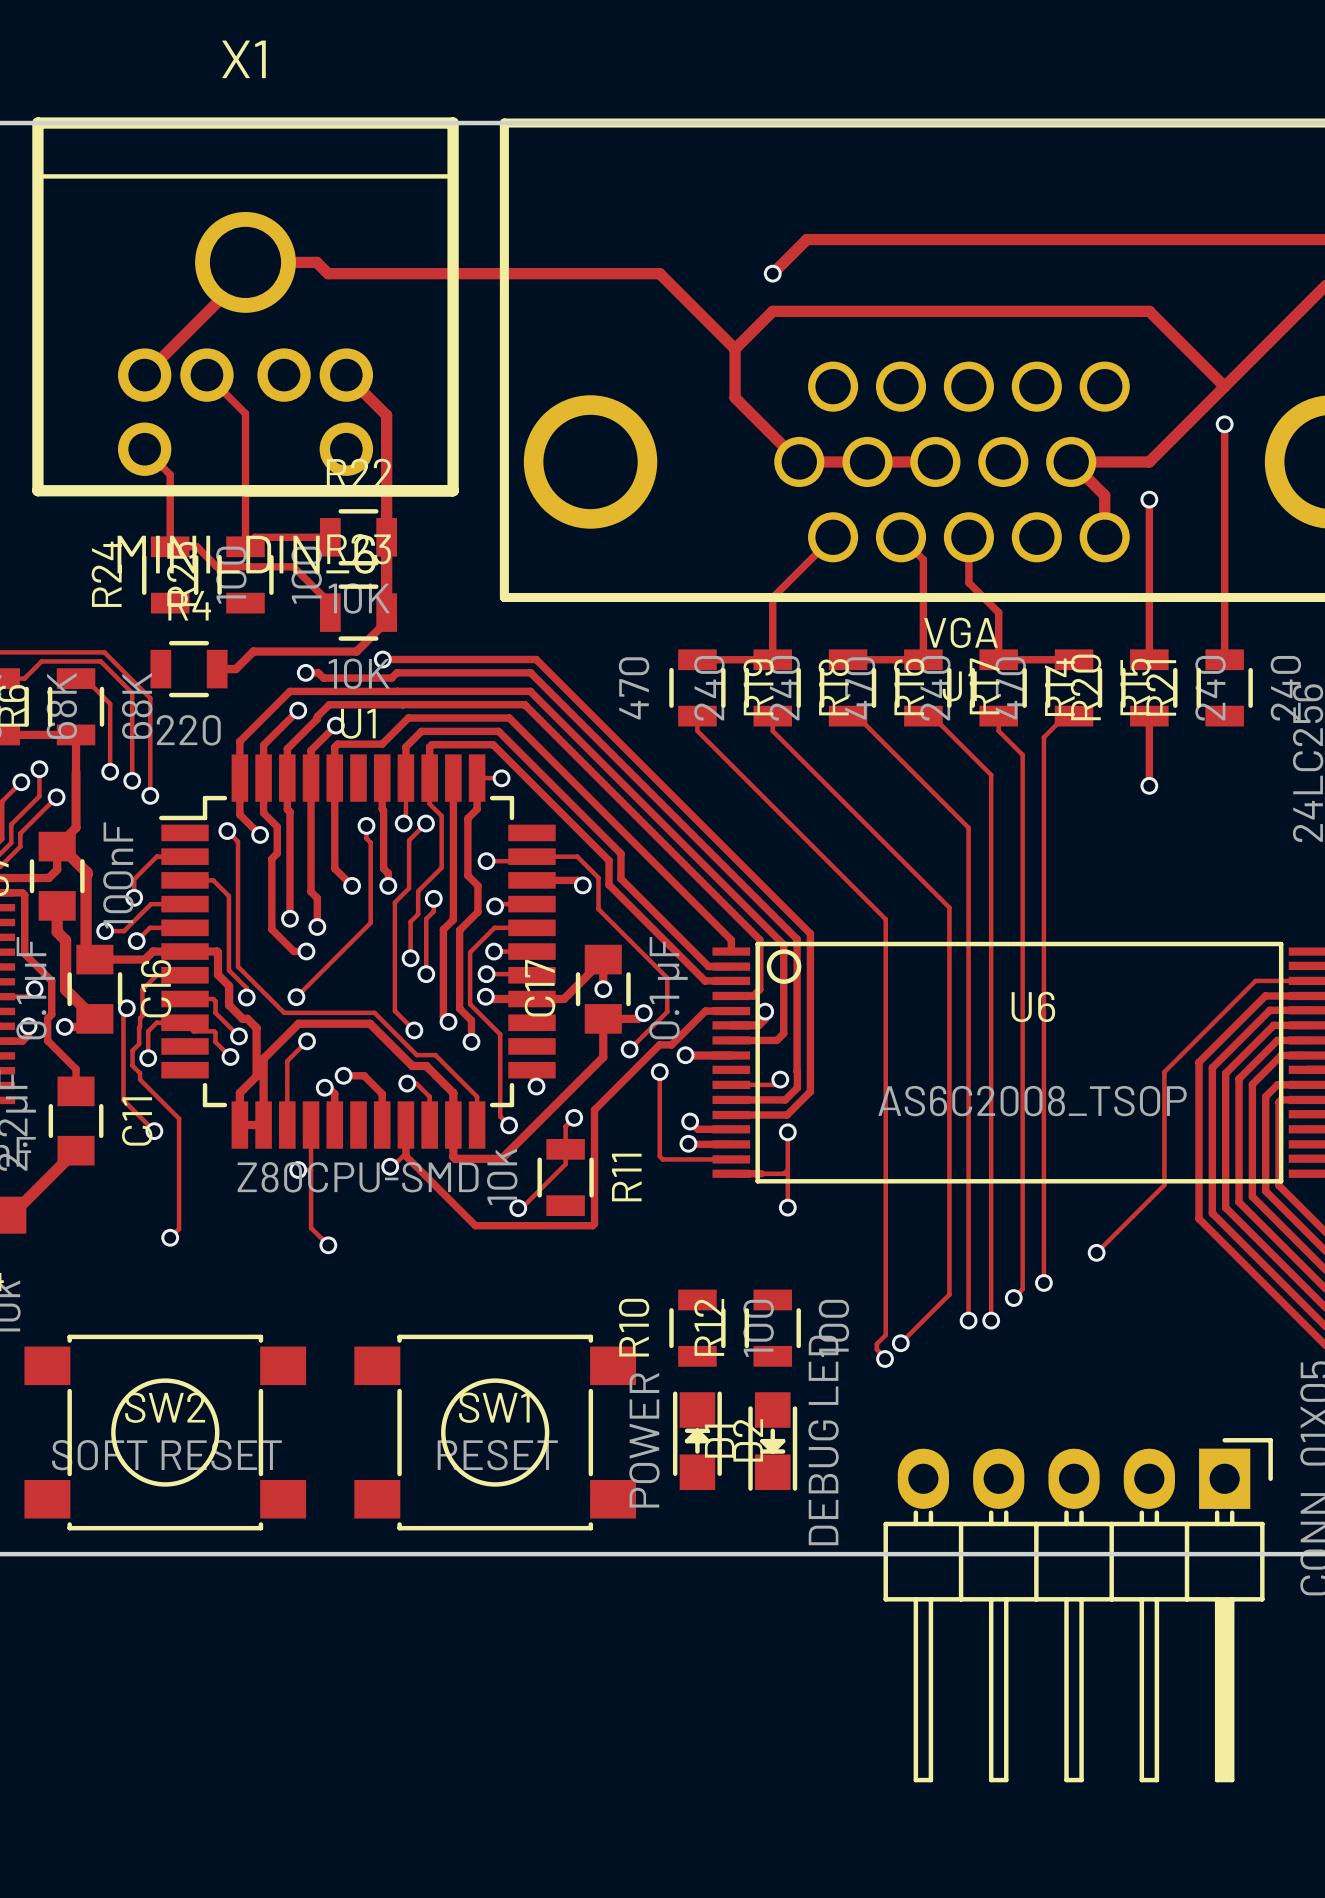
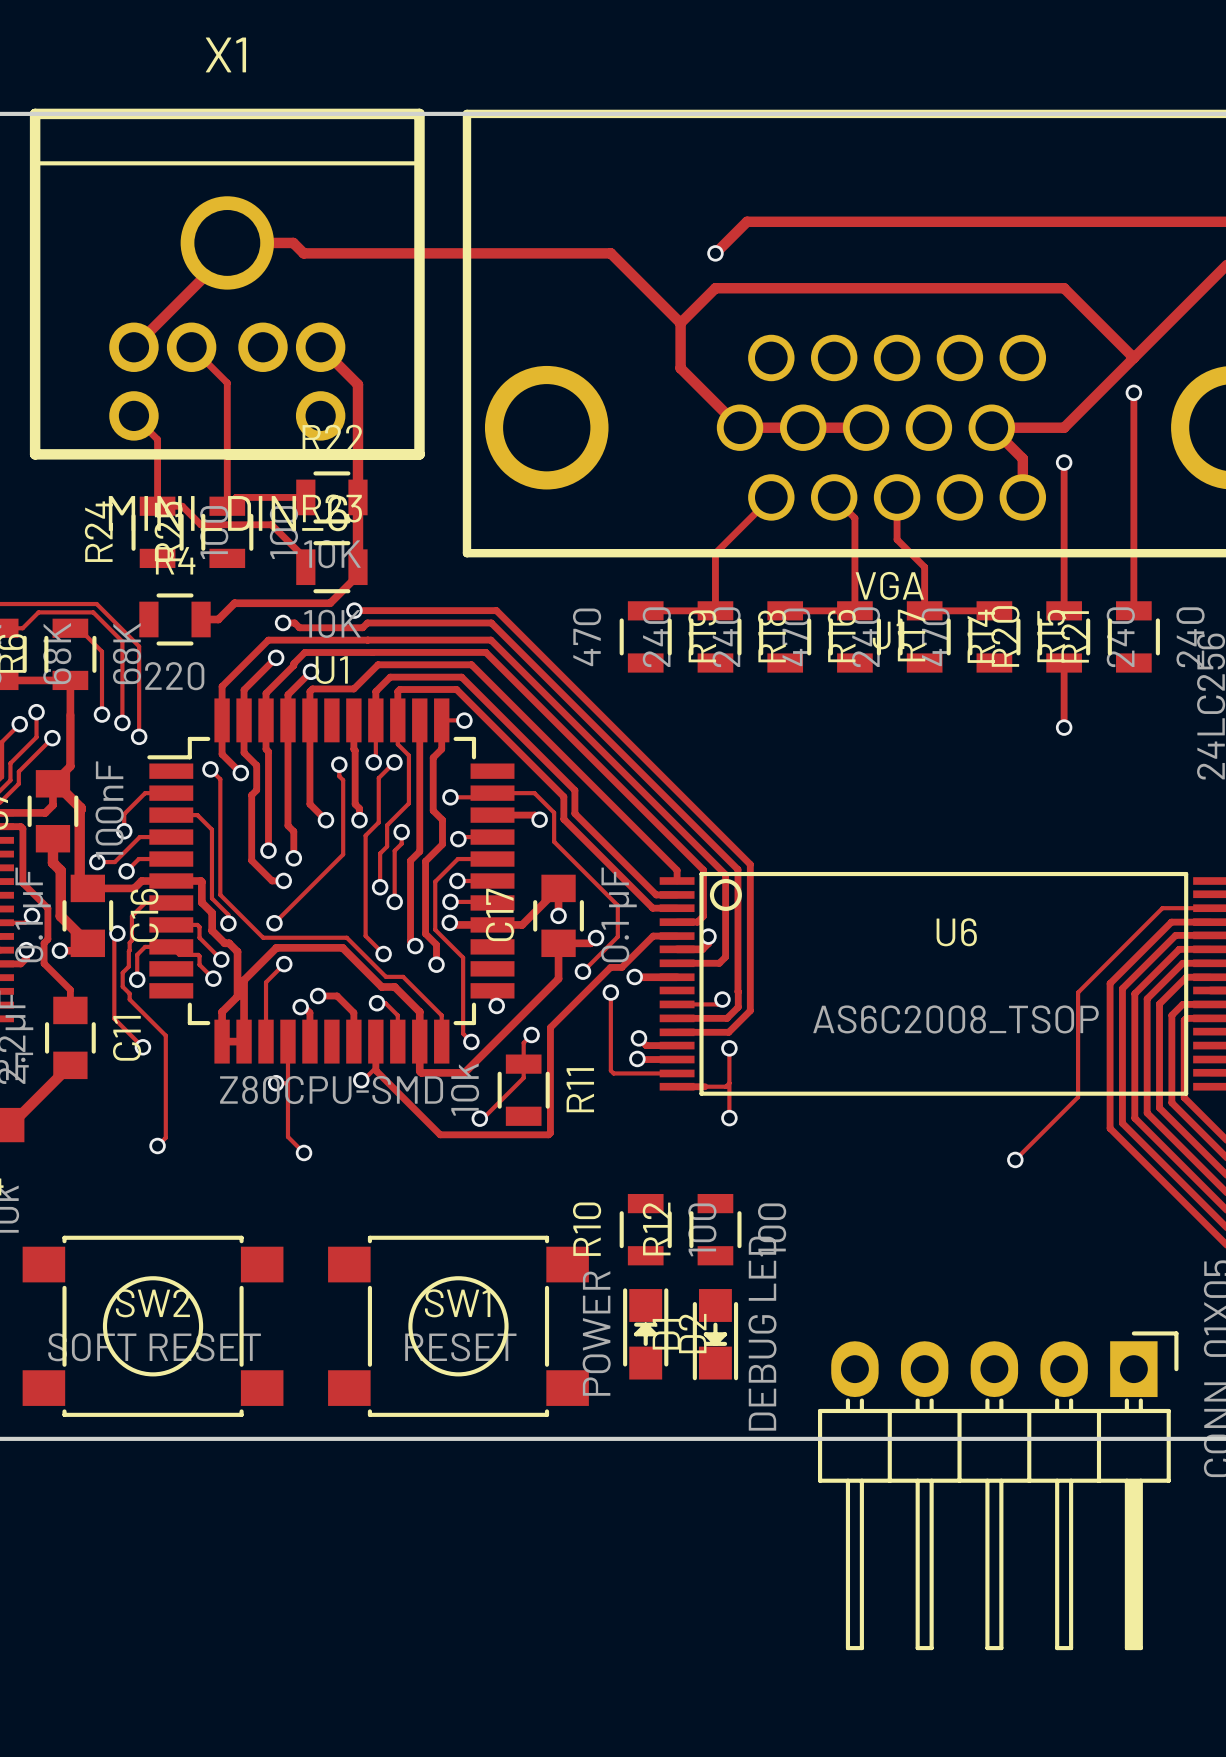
track: (697, 716) (697, 731) (885, 919) (885, 1335) (876, 1343) (876, 1349) (885, 1359) -> none
track: (772, 716) (772, 731) (949, 907) (949, 1294) (900, 1343) -> none
track: (848, 716) (856, 716) (968, 827) (968, 1320) -> none
track: (923, 716) (932, 716) (991, 775) (991, 1320) -> none
track: (998, 716) (998, 731) (1022, 754) (1022, 1289) (1013, 1298) -> none
track: (1074, 716) (1065, 716) (1043, 737) (1043, 1282) -> none
via: (1043, 1282) -> none
via: (1013, 1298) -> none
via: (968, 1320) -> none
via: (991, 1320) -> none
via: (900, 1343) -> none
via: (885, 1359) -> none

